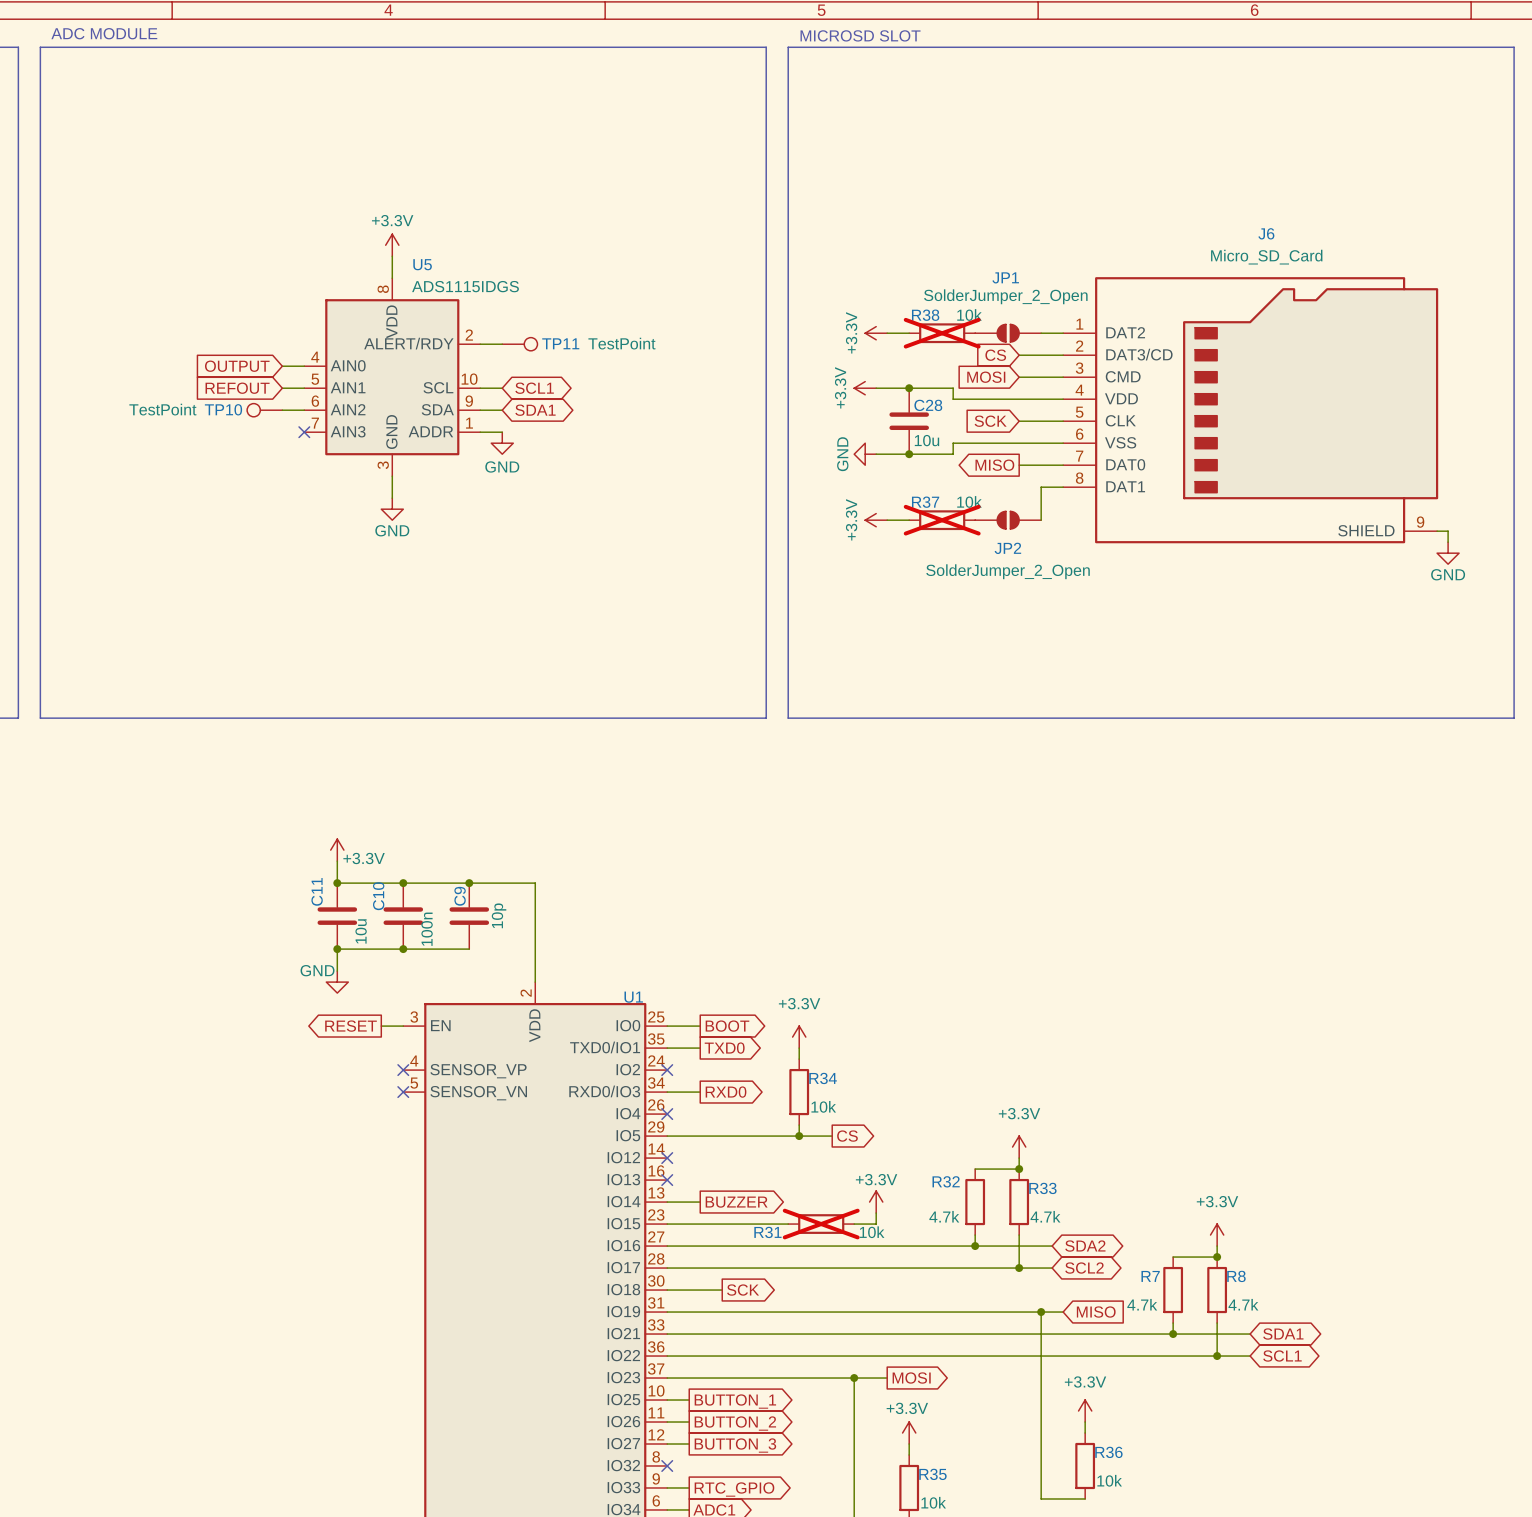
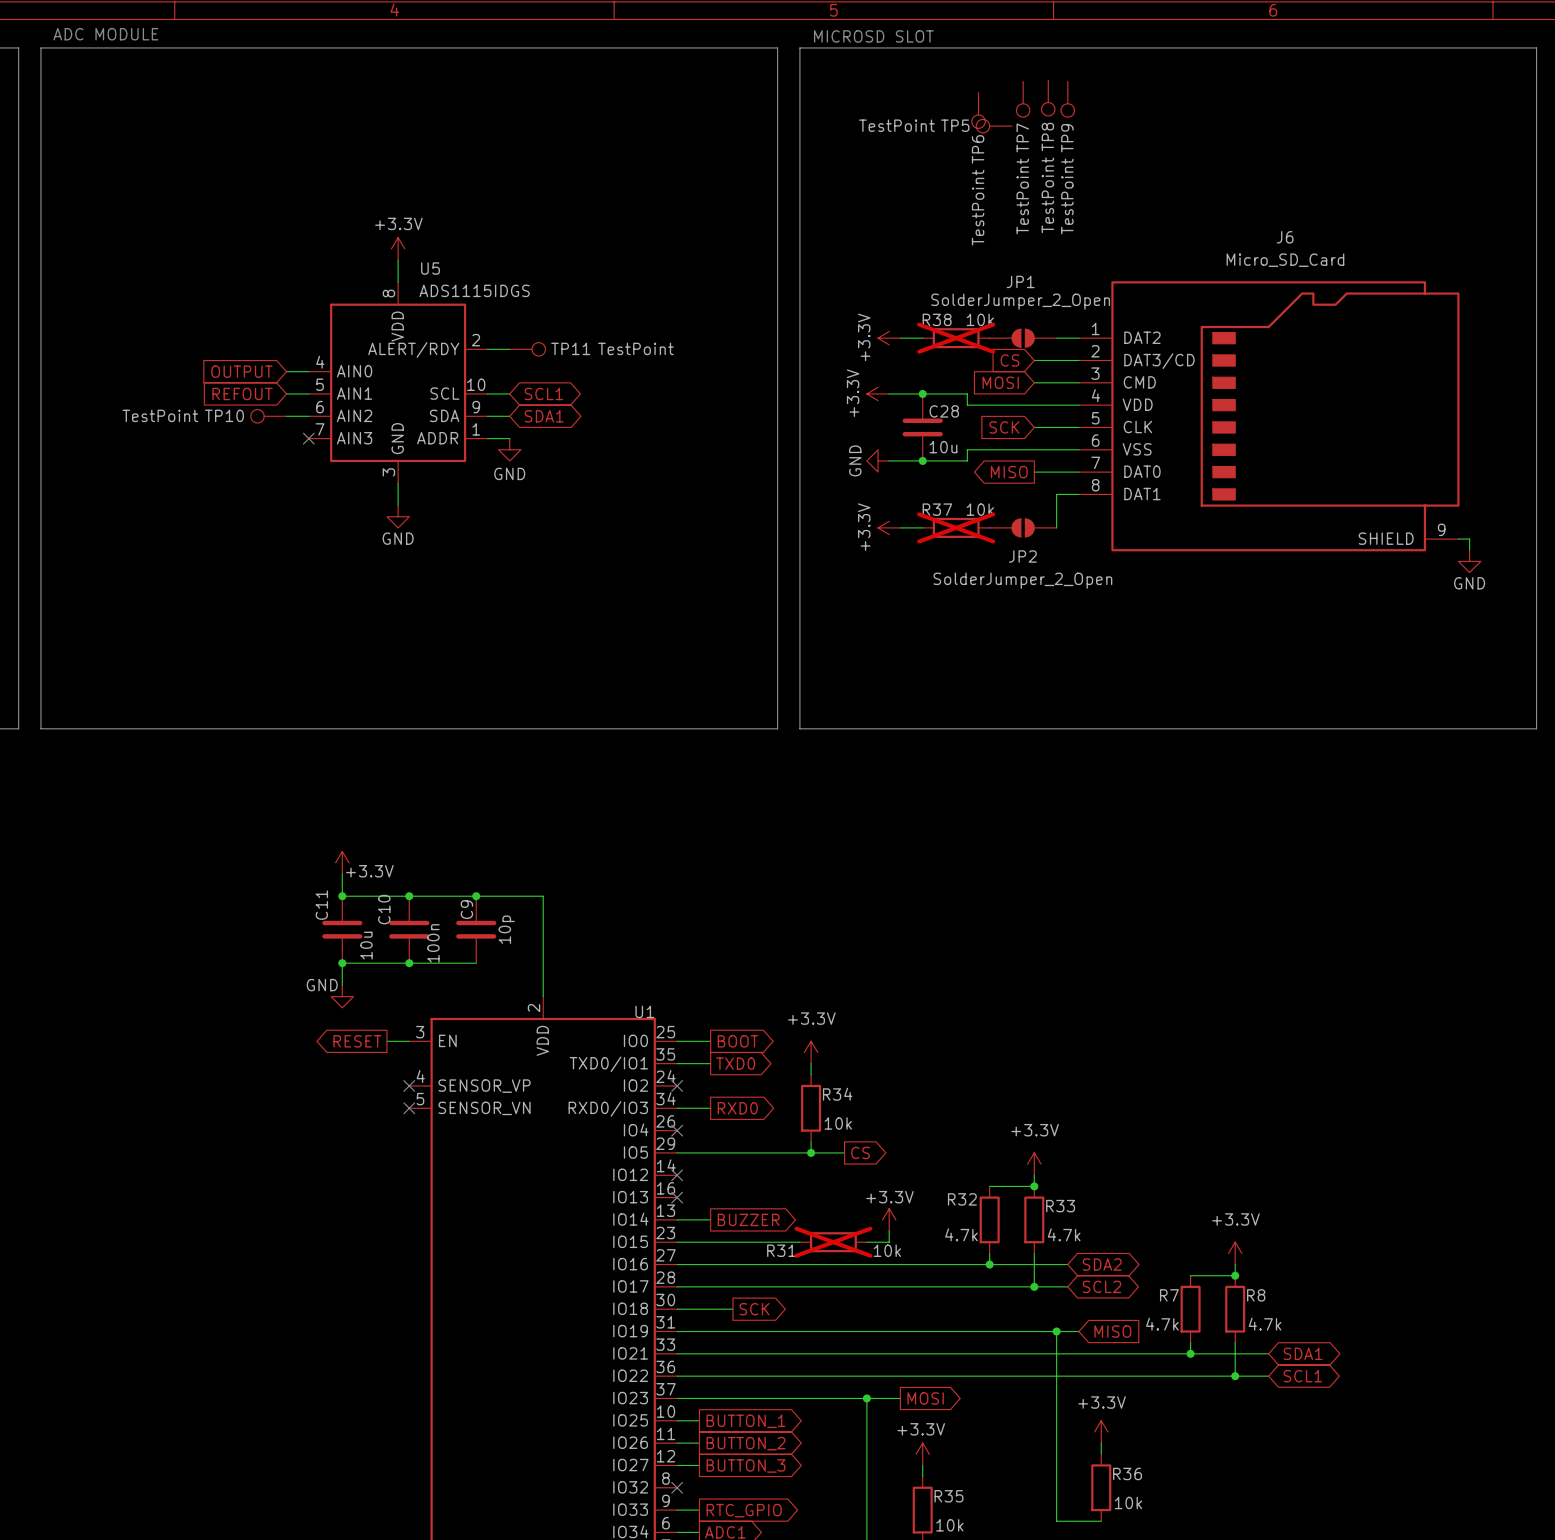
TP8: none -> TestPoint (1048, 98)
TP7: none -> TestPoint (1023, 99)
TP9: none -> TestPoint (1067, 99)
TP6: none -> TestPoint (978, 110)
TP5: none -> TestPoint (994, 126)

